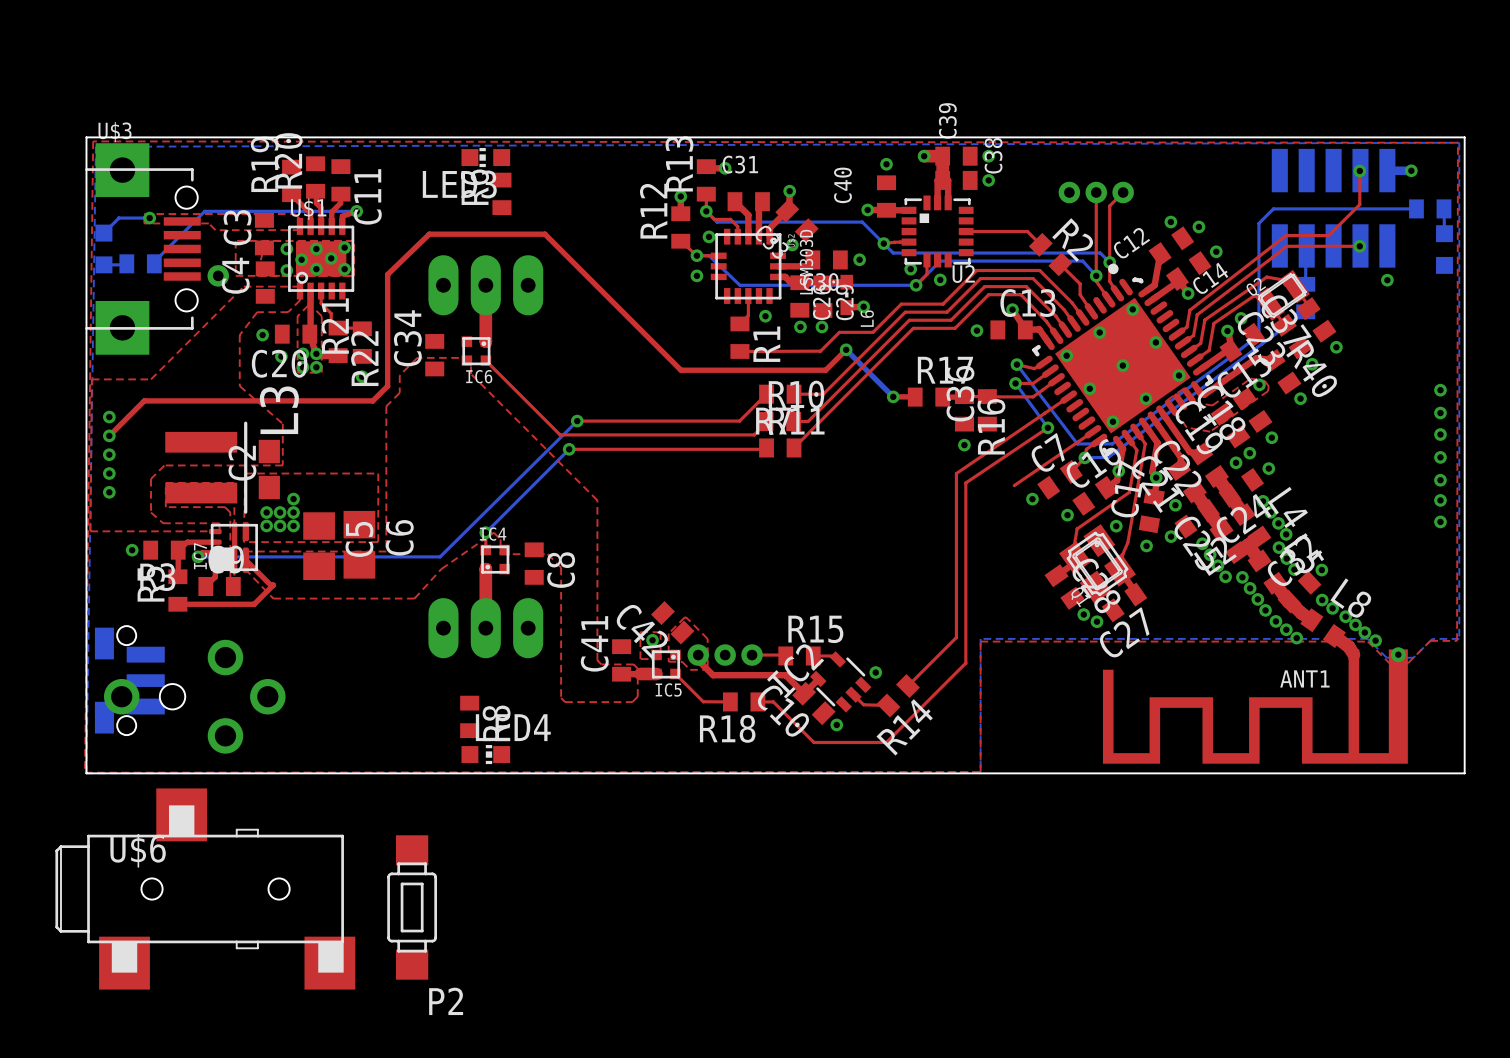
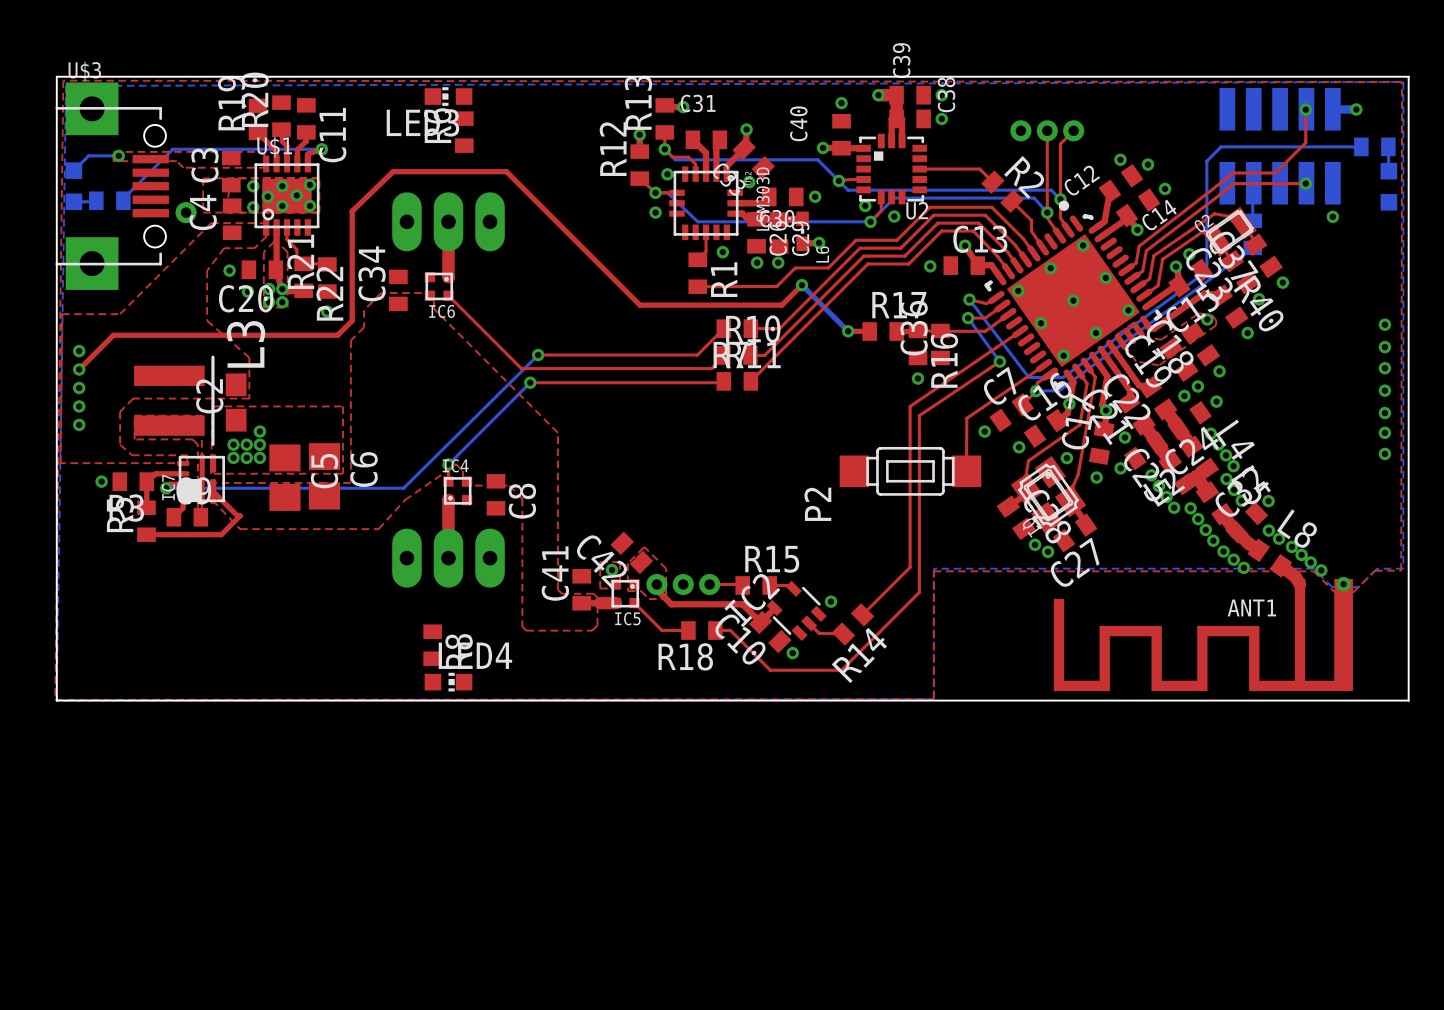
top track: none -> (966, 418) (966, 471)
part: (129, 680) -> none
part: (194, 696) -> none
U$6: (205, 889) -> none
P2 rotation: 0° (412, 907) -> 90° clockwise (910, 471)
P2 position: (412, 907) -> (910, 471)

